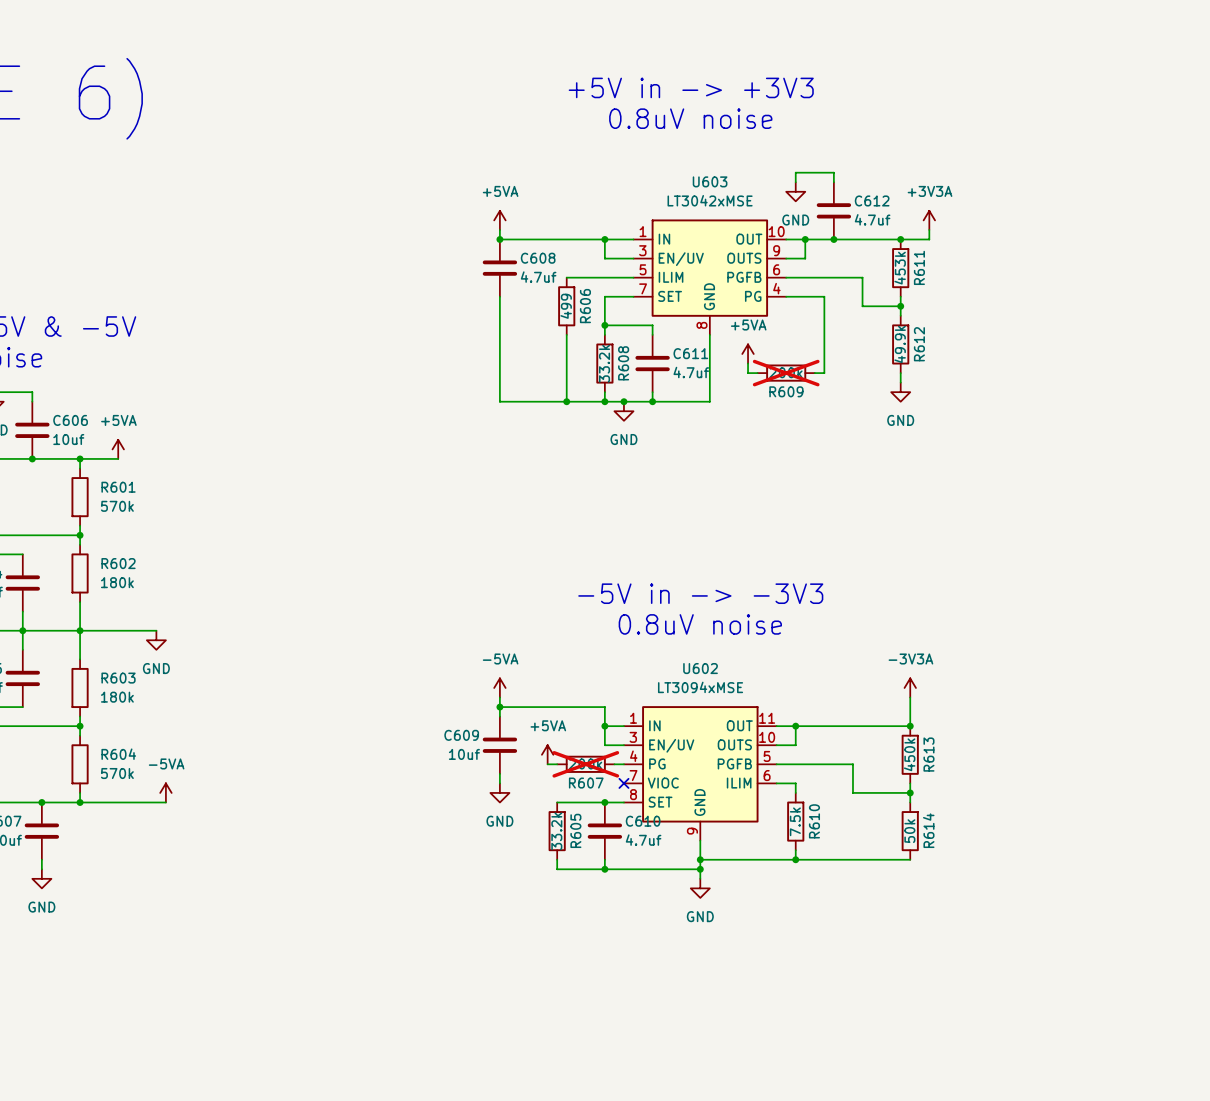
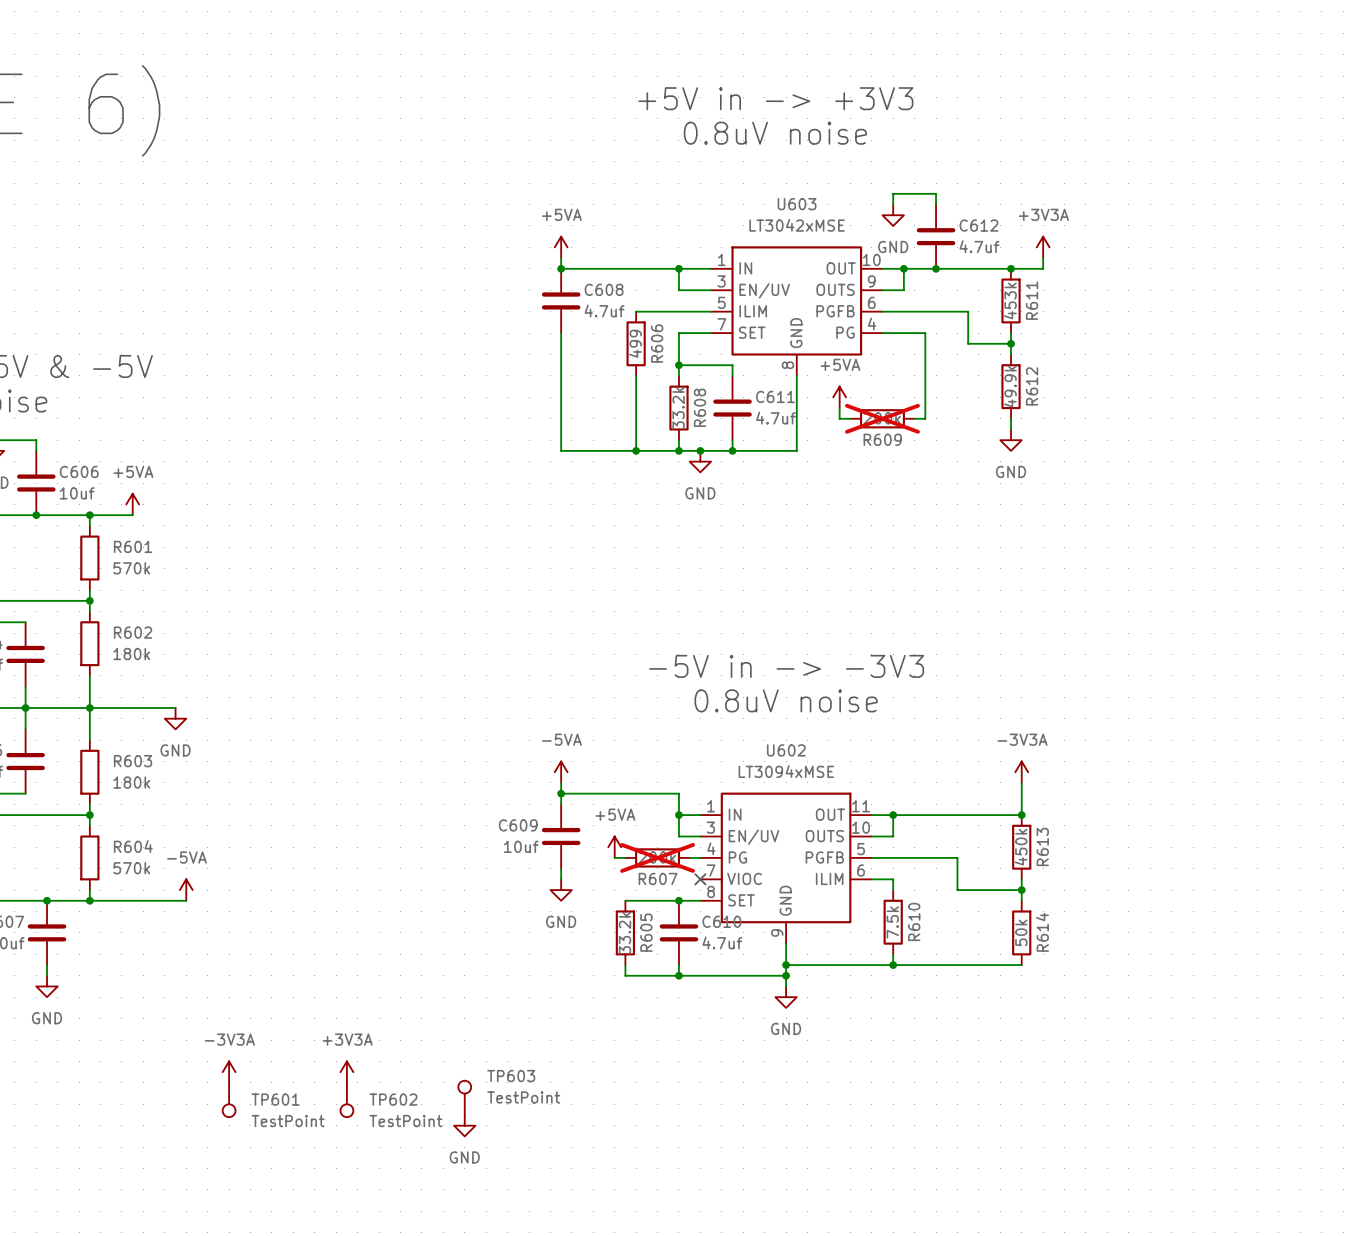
power symbol: none -> -3V3A (229, 1072)
power symbol: none -> +3V3A (346, 1072)
TP603: none -> TestPoint (464, 1097)
TP601: none -> TestPoint (229, 1100)
TP602: none -> TestPoint (346, 1100)
power symbol: none -> GND (464, 1125)

